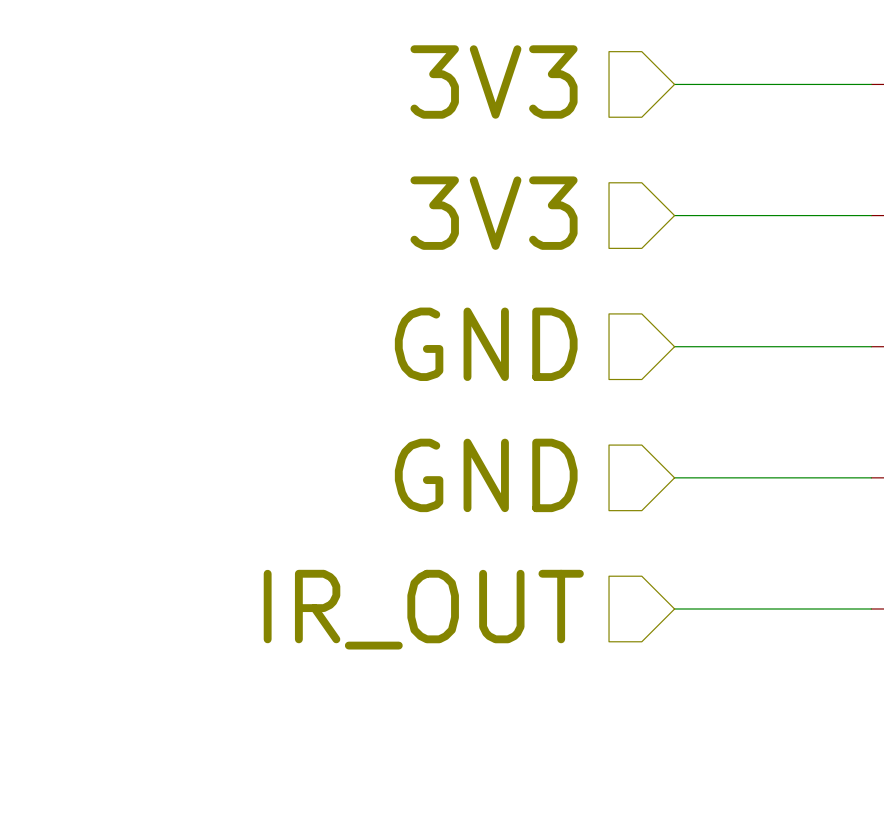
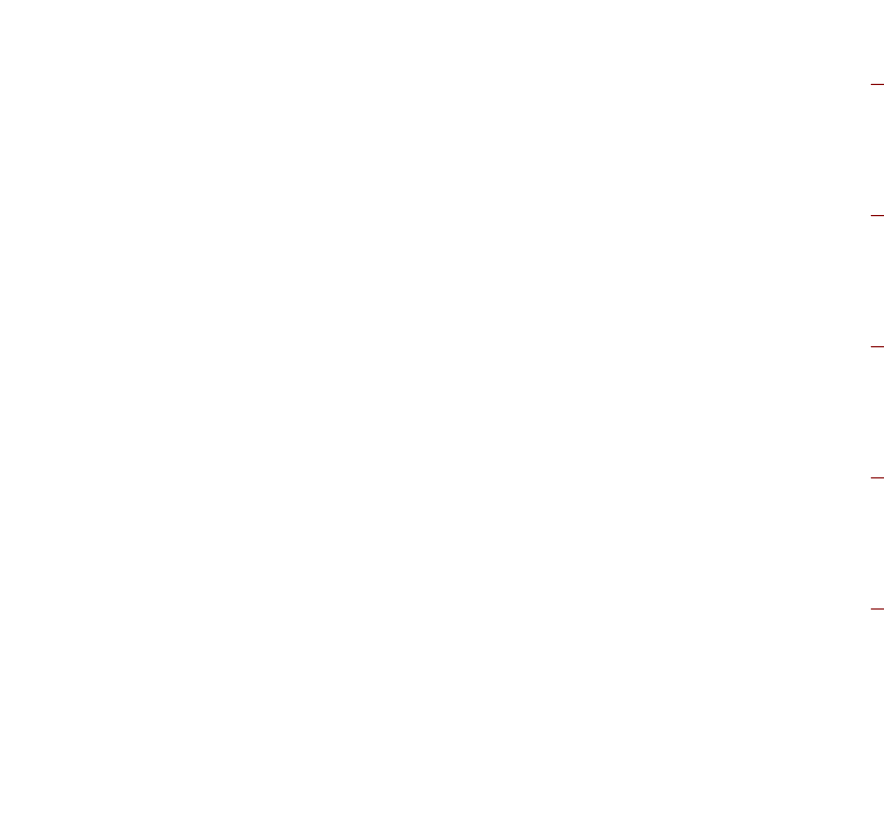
hierarchical label: 3V3 (494, 81) -> none
wire: (674, 84) (871, 84) -> none
hierarchical label: 3V3 (494, 213) -> none
wire: (674, 215) (871, 215) -> none
hierarchical label: GND (486, 344) -> none
wire: (674, 346) (871, 346) -> none
hierarchical label: GND (486, 475) -> none
wire: (674, 477) (871, 477) -> none
wire: (674, 608) (871, 608) -> none
hierarchical label: IR_OUT (423, 609) -> none

